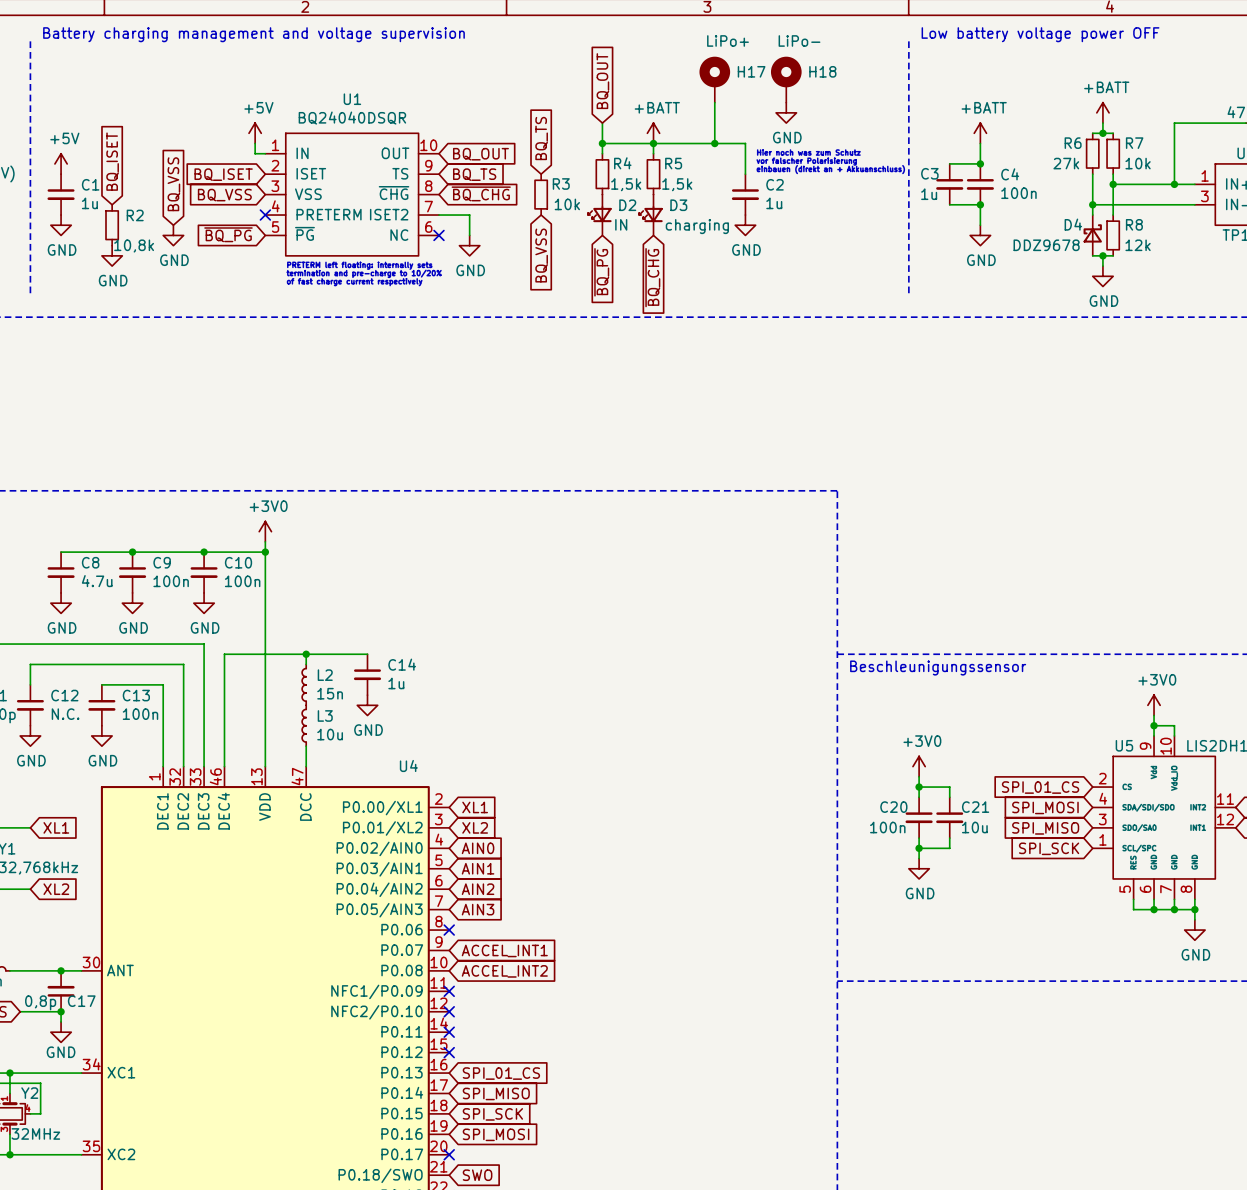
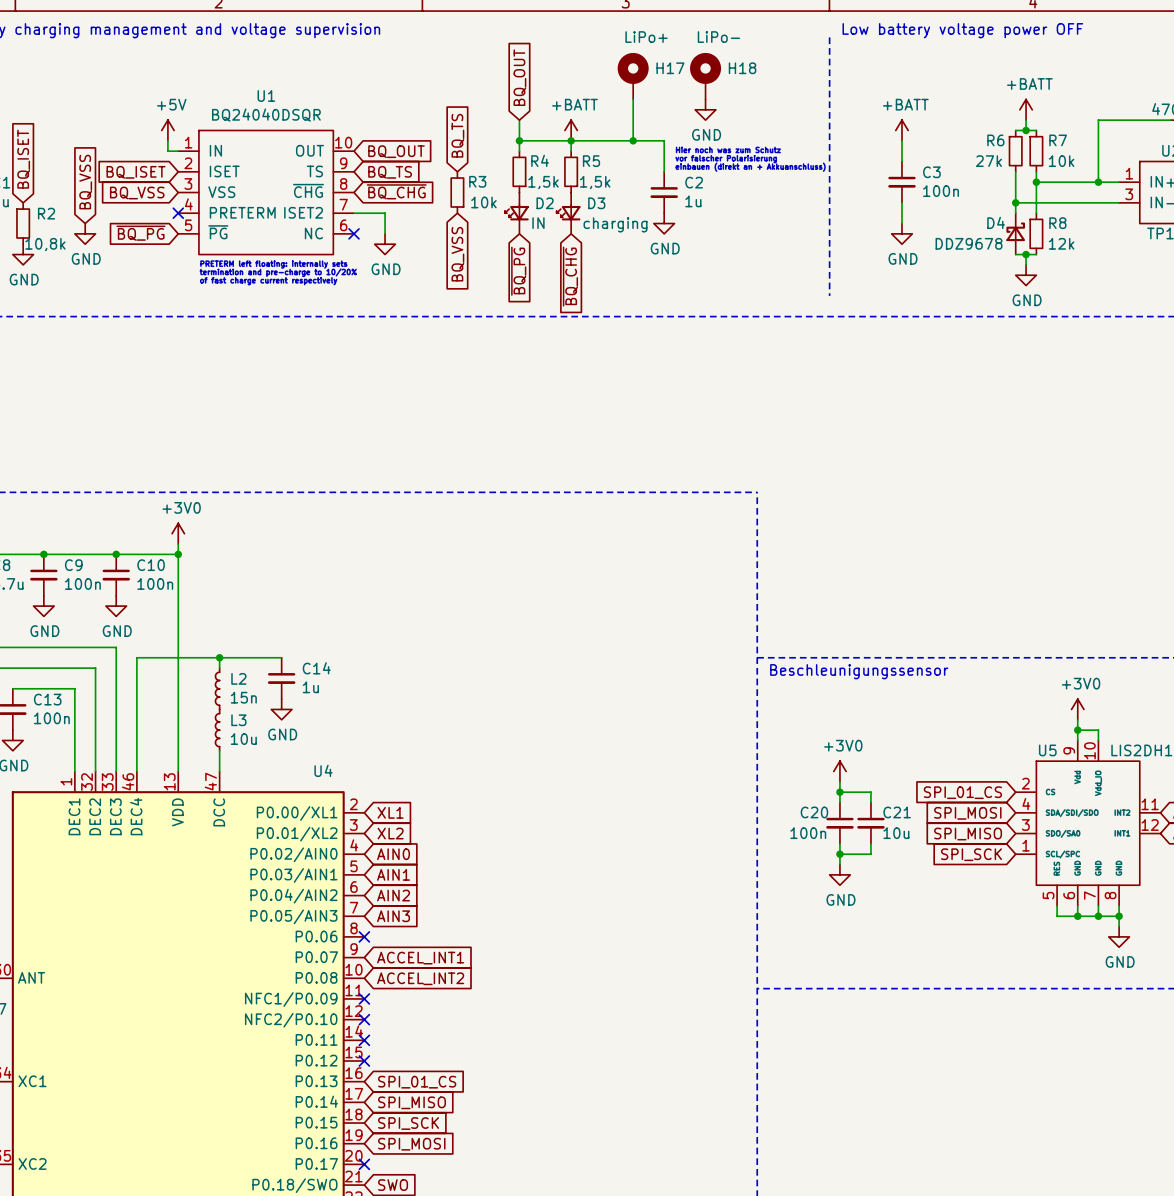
wire: (949, 163) (980, 163) -> none
junction: (980, 163) -> none
C4 name: C4 (1010, 174) -> C3 (931, 172)
C3: 1u (949, 184) -> none
wire: (949, 204) (980, 204) -> none
junction: (980, 204) -> none

